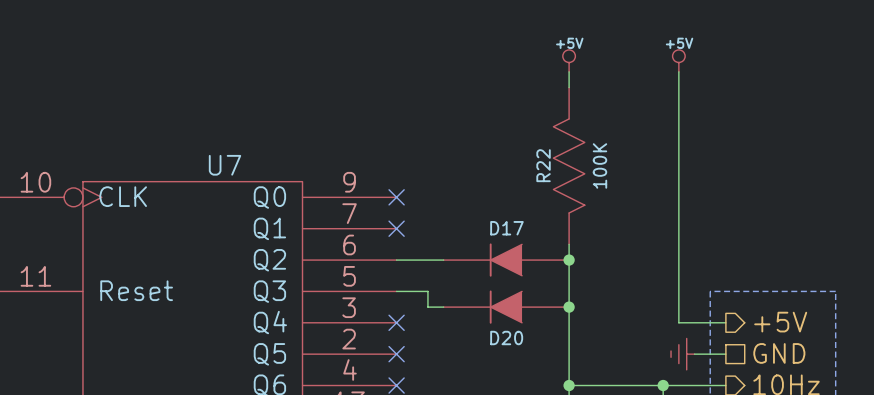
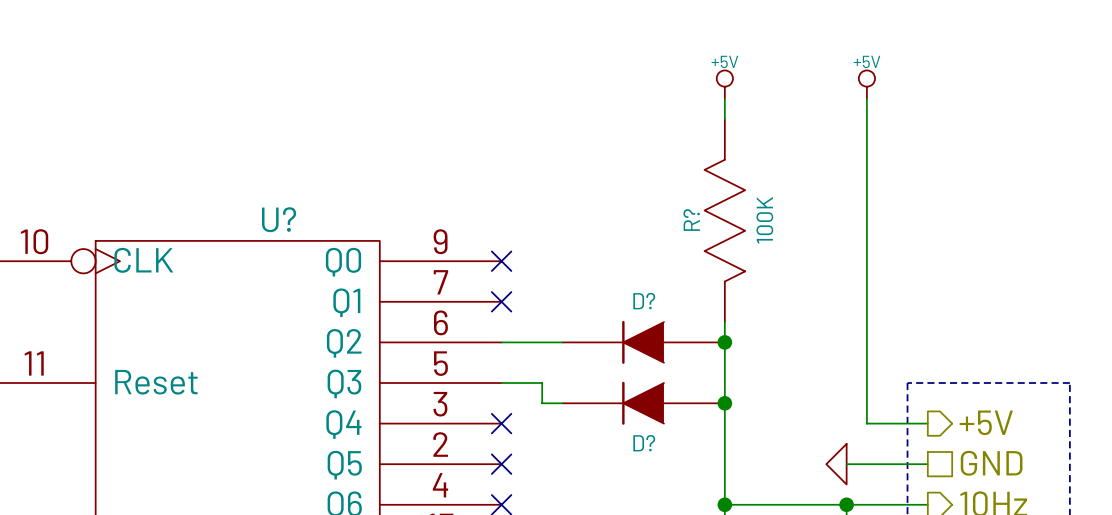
U7 name: U7 (225, 165) -> U? (279, 219)
R22 name: R22 (543, 165) -> R? (691, 220)
D17 name: D17 (506, 228) -> D? (644, 301)
D20 name: D20 (506, 338) -> D? (644, 443)
power symbol: none -> (836, 464)
wire: none -> (846, 464) (887, 464)
power symbol: (682, 354) -> none

